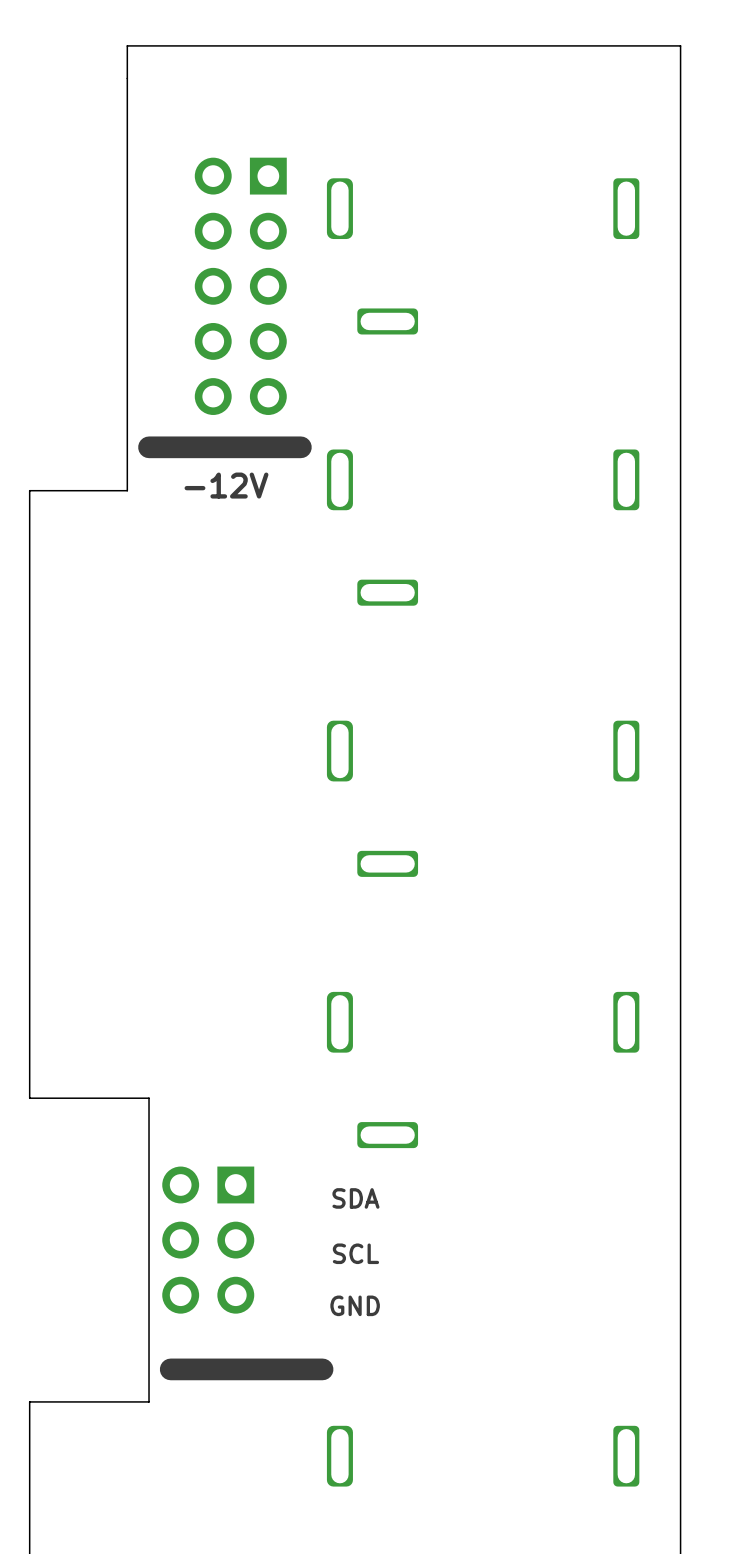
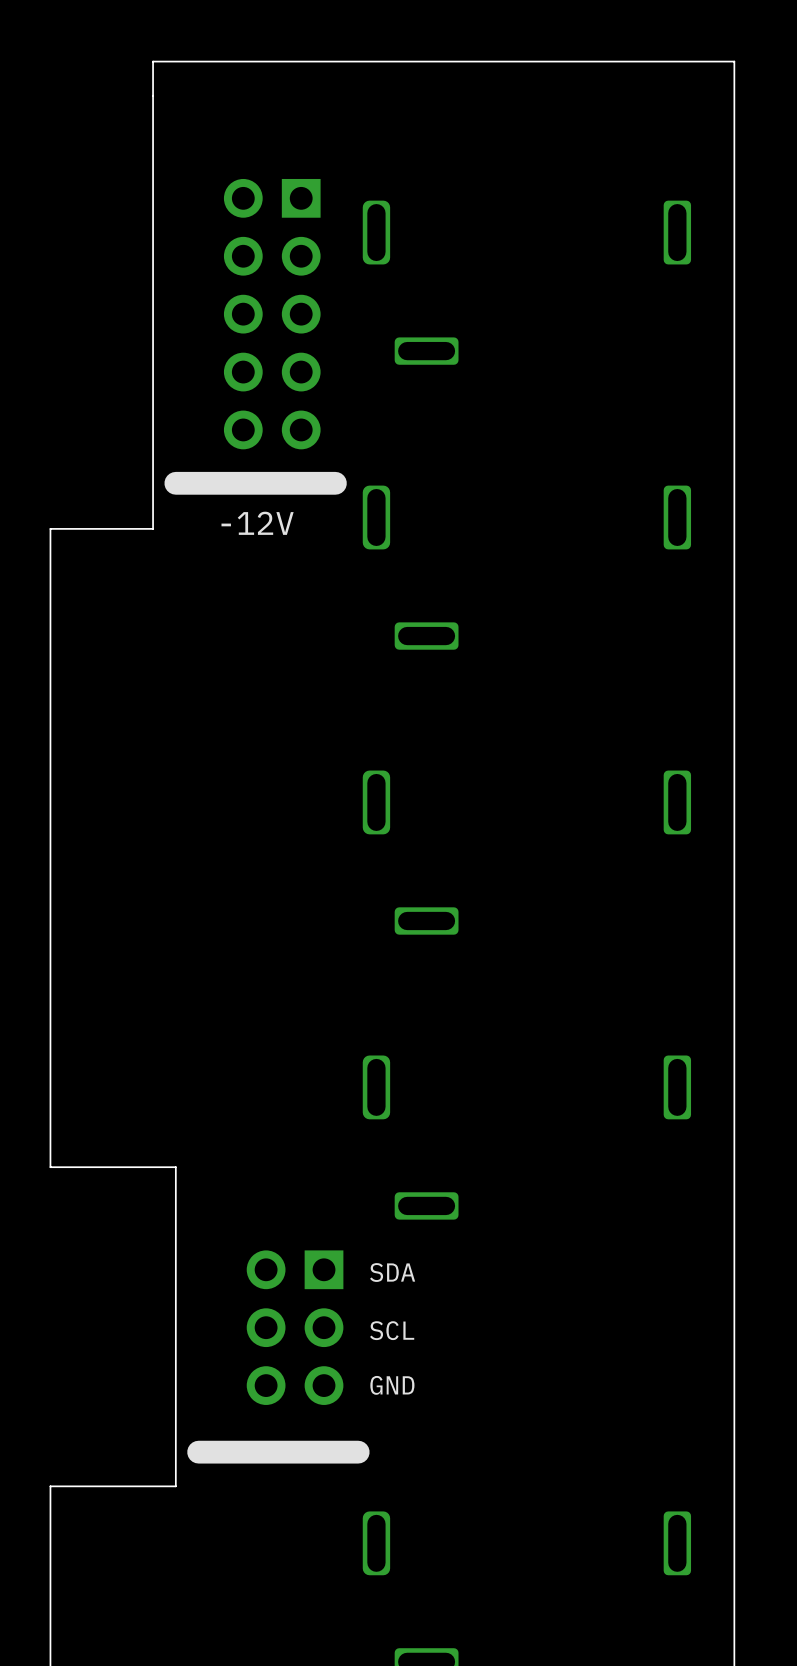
part position: (208, 1240) -> (295, 1327)

